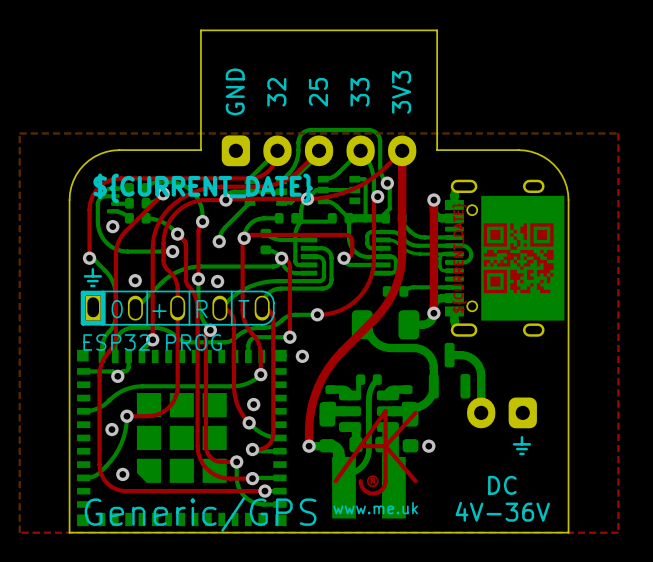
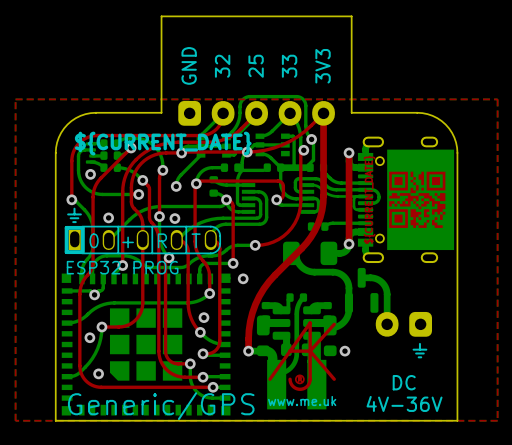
bottom track: (433, 386) (432, 393) (427, 401) (419, 406) (410, 407) -> none
bottom track: none -> (348, 309) (343, 322) (330, 328)

